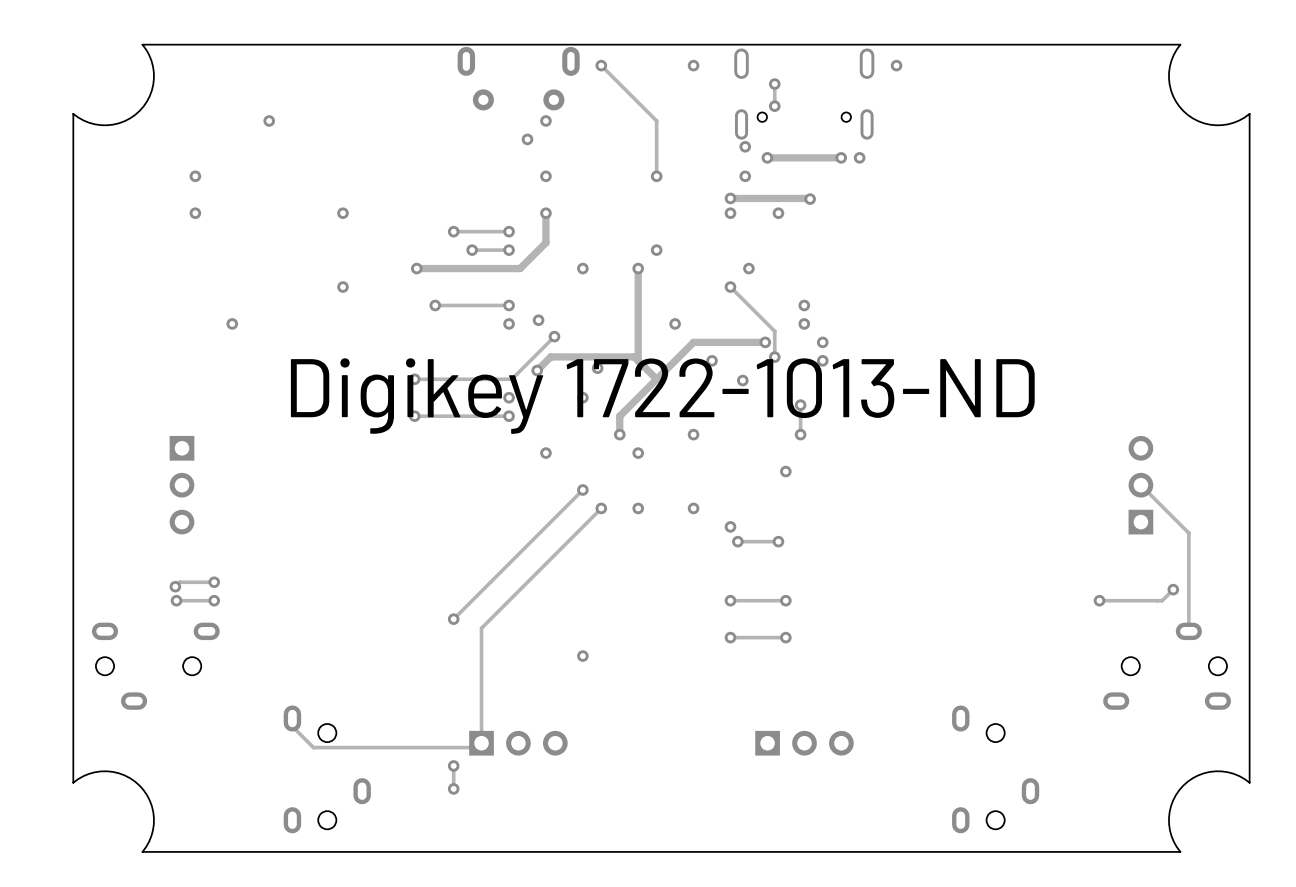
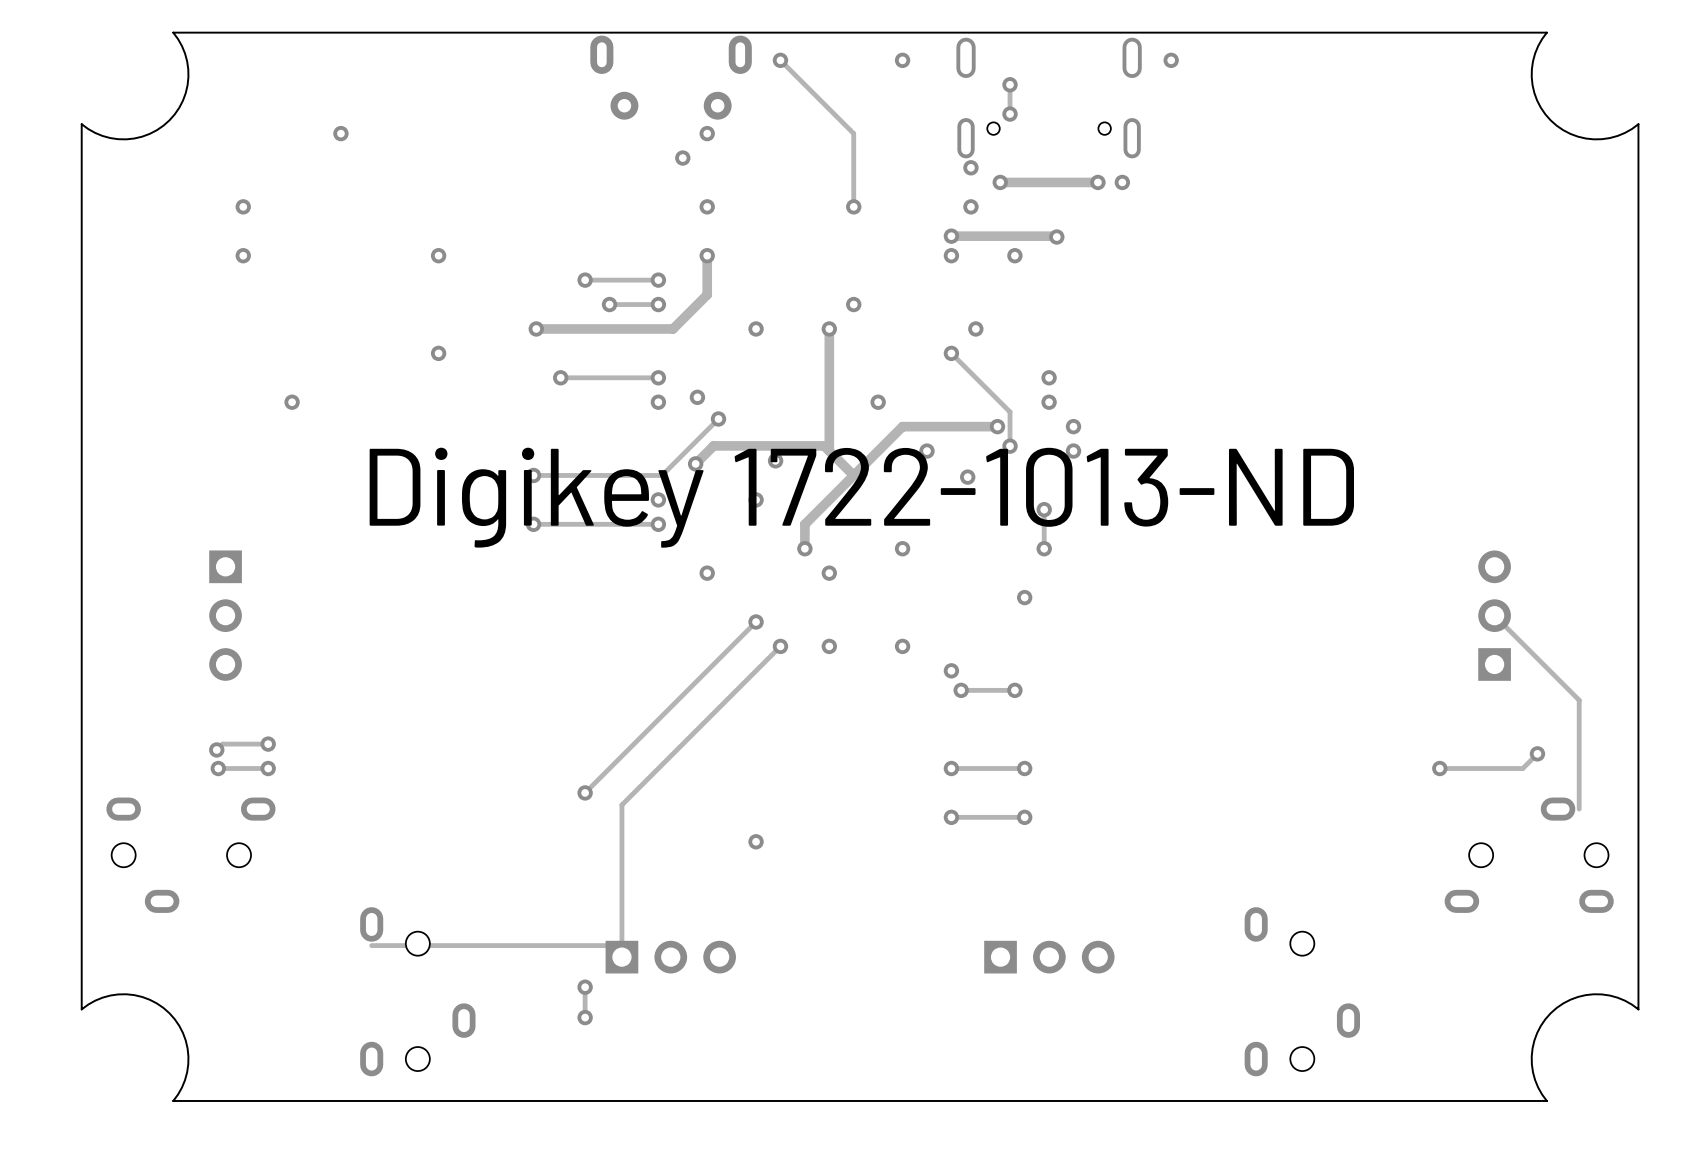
track: (1188, 533) (1188, 631) -> (1558, 679) (1579, 700) (1579, 809)
track: (292, 718) (292, 726) (313, 747) (477, 747) (481, 743) -> (371, 945) (610, 945) (621, 957)

